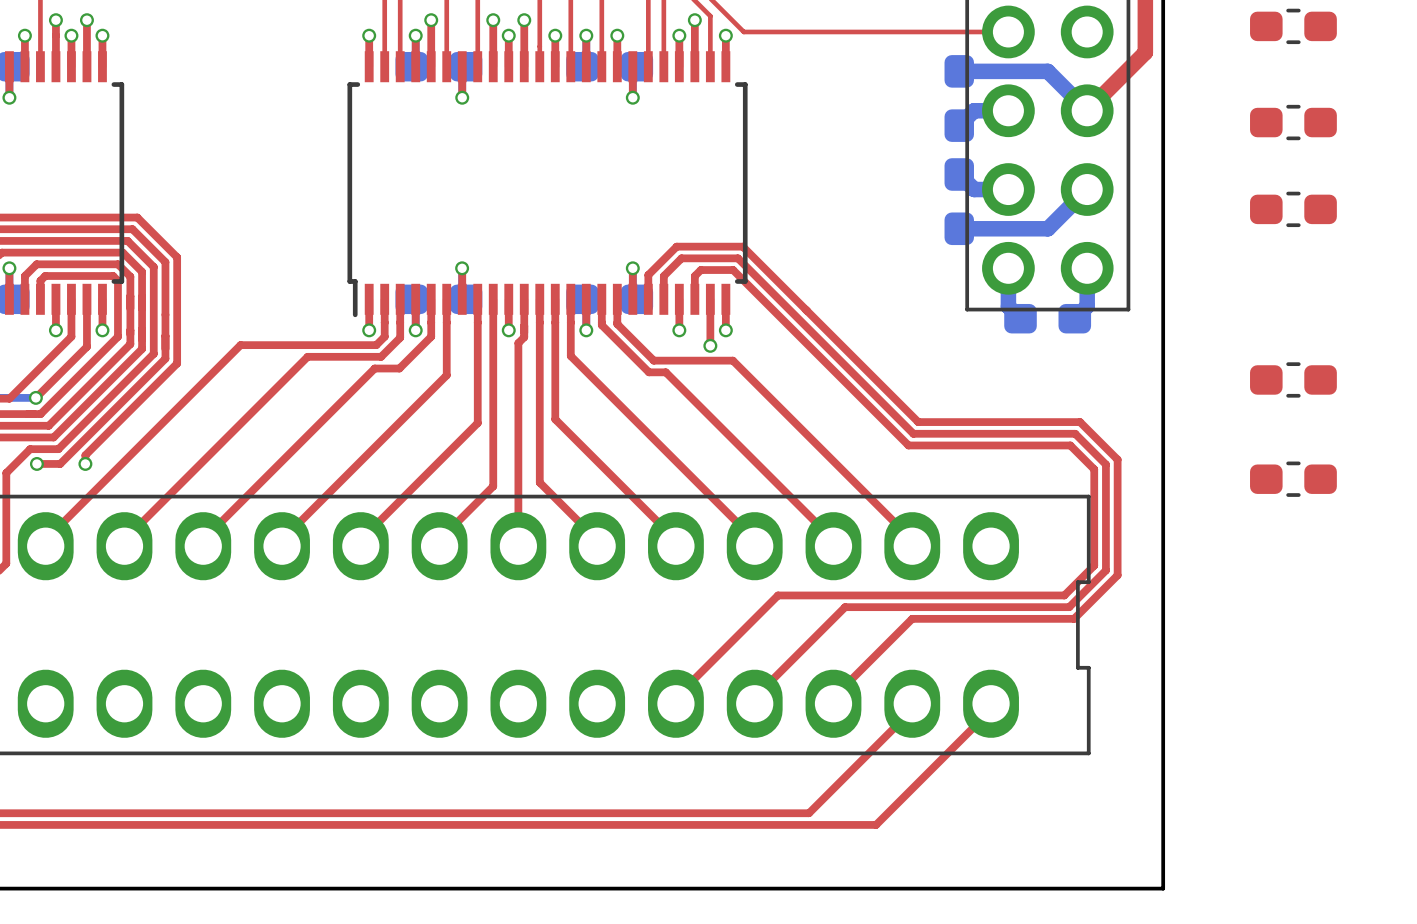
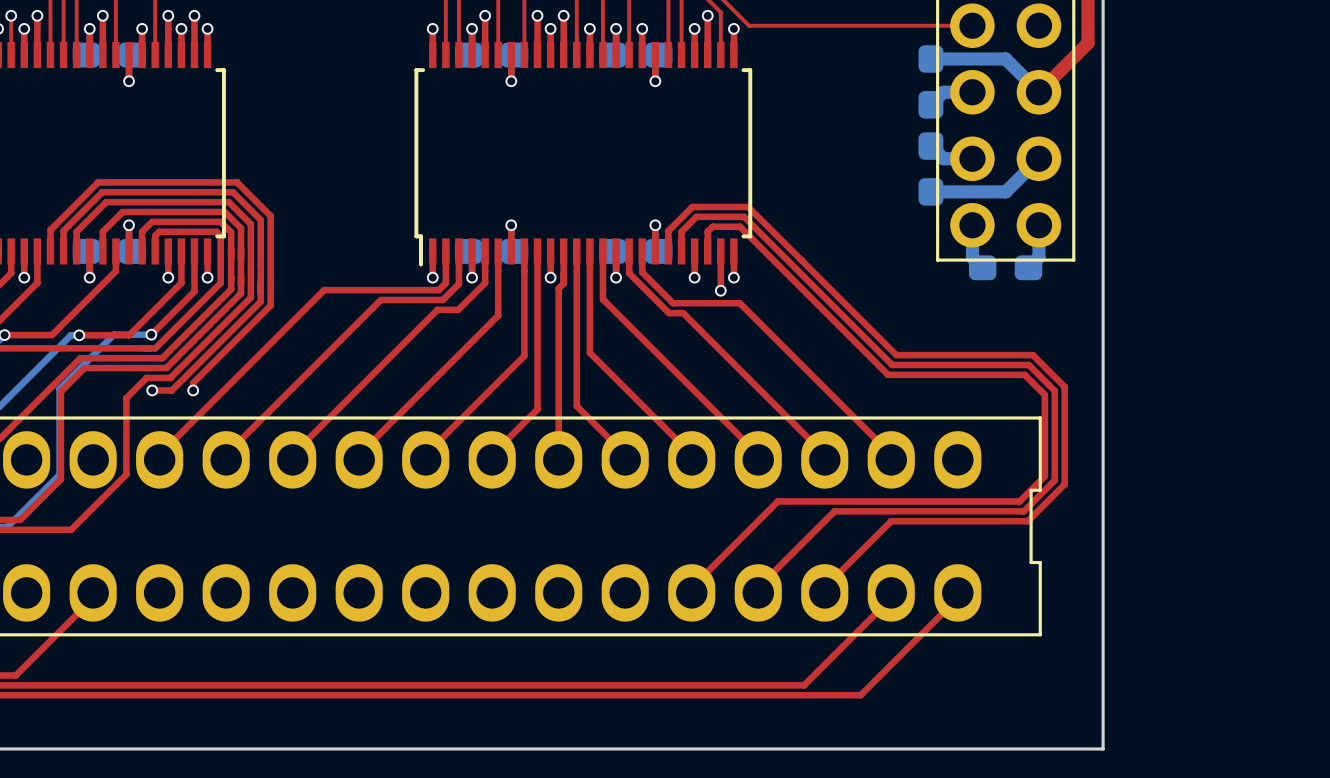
part: (1293, 26) -> none
part: (1293, 122) -> none
part: (1293, 209) -> none
part: (1293, 379) -> none
part: (1293, 479) -> none

